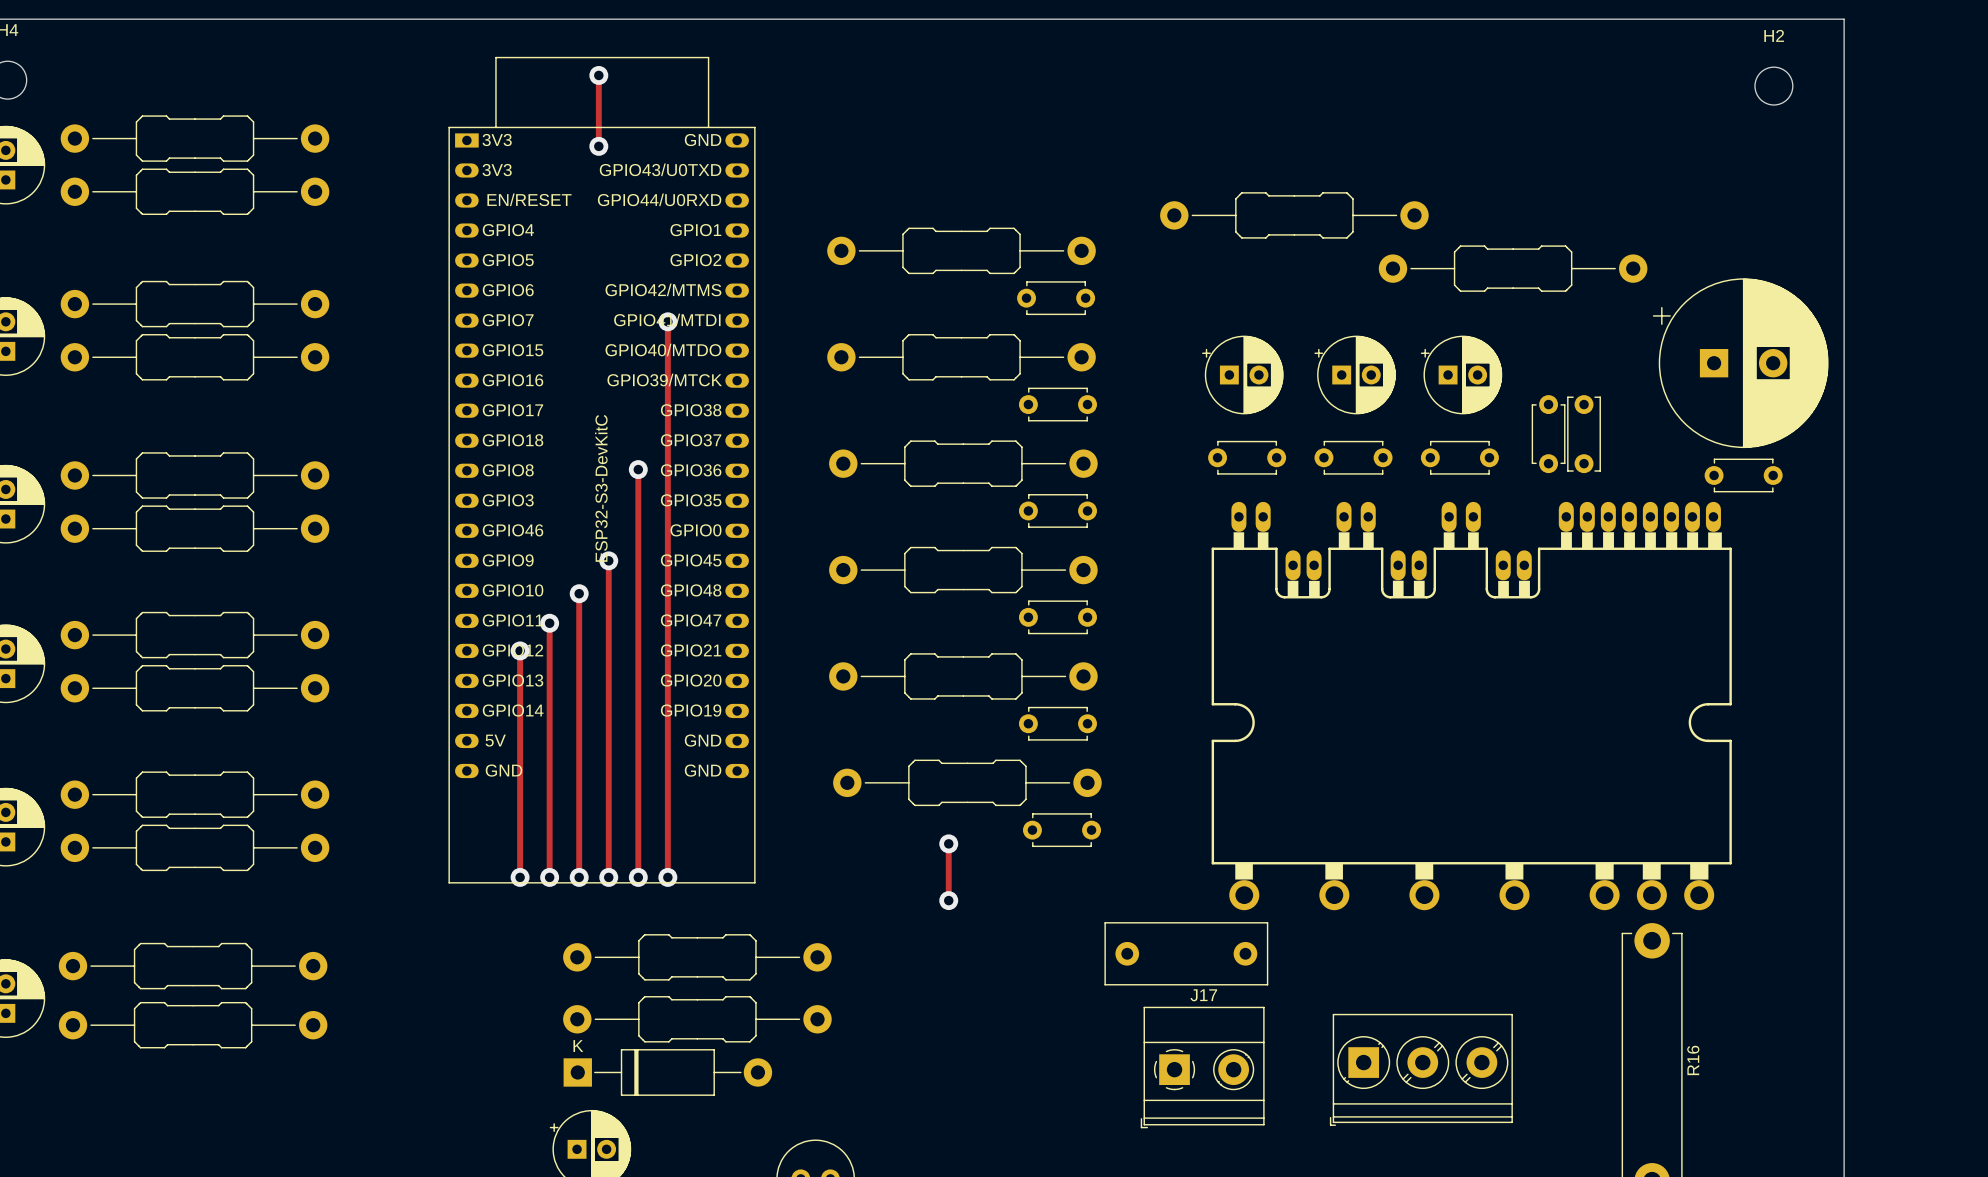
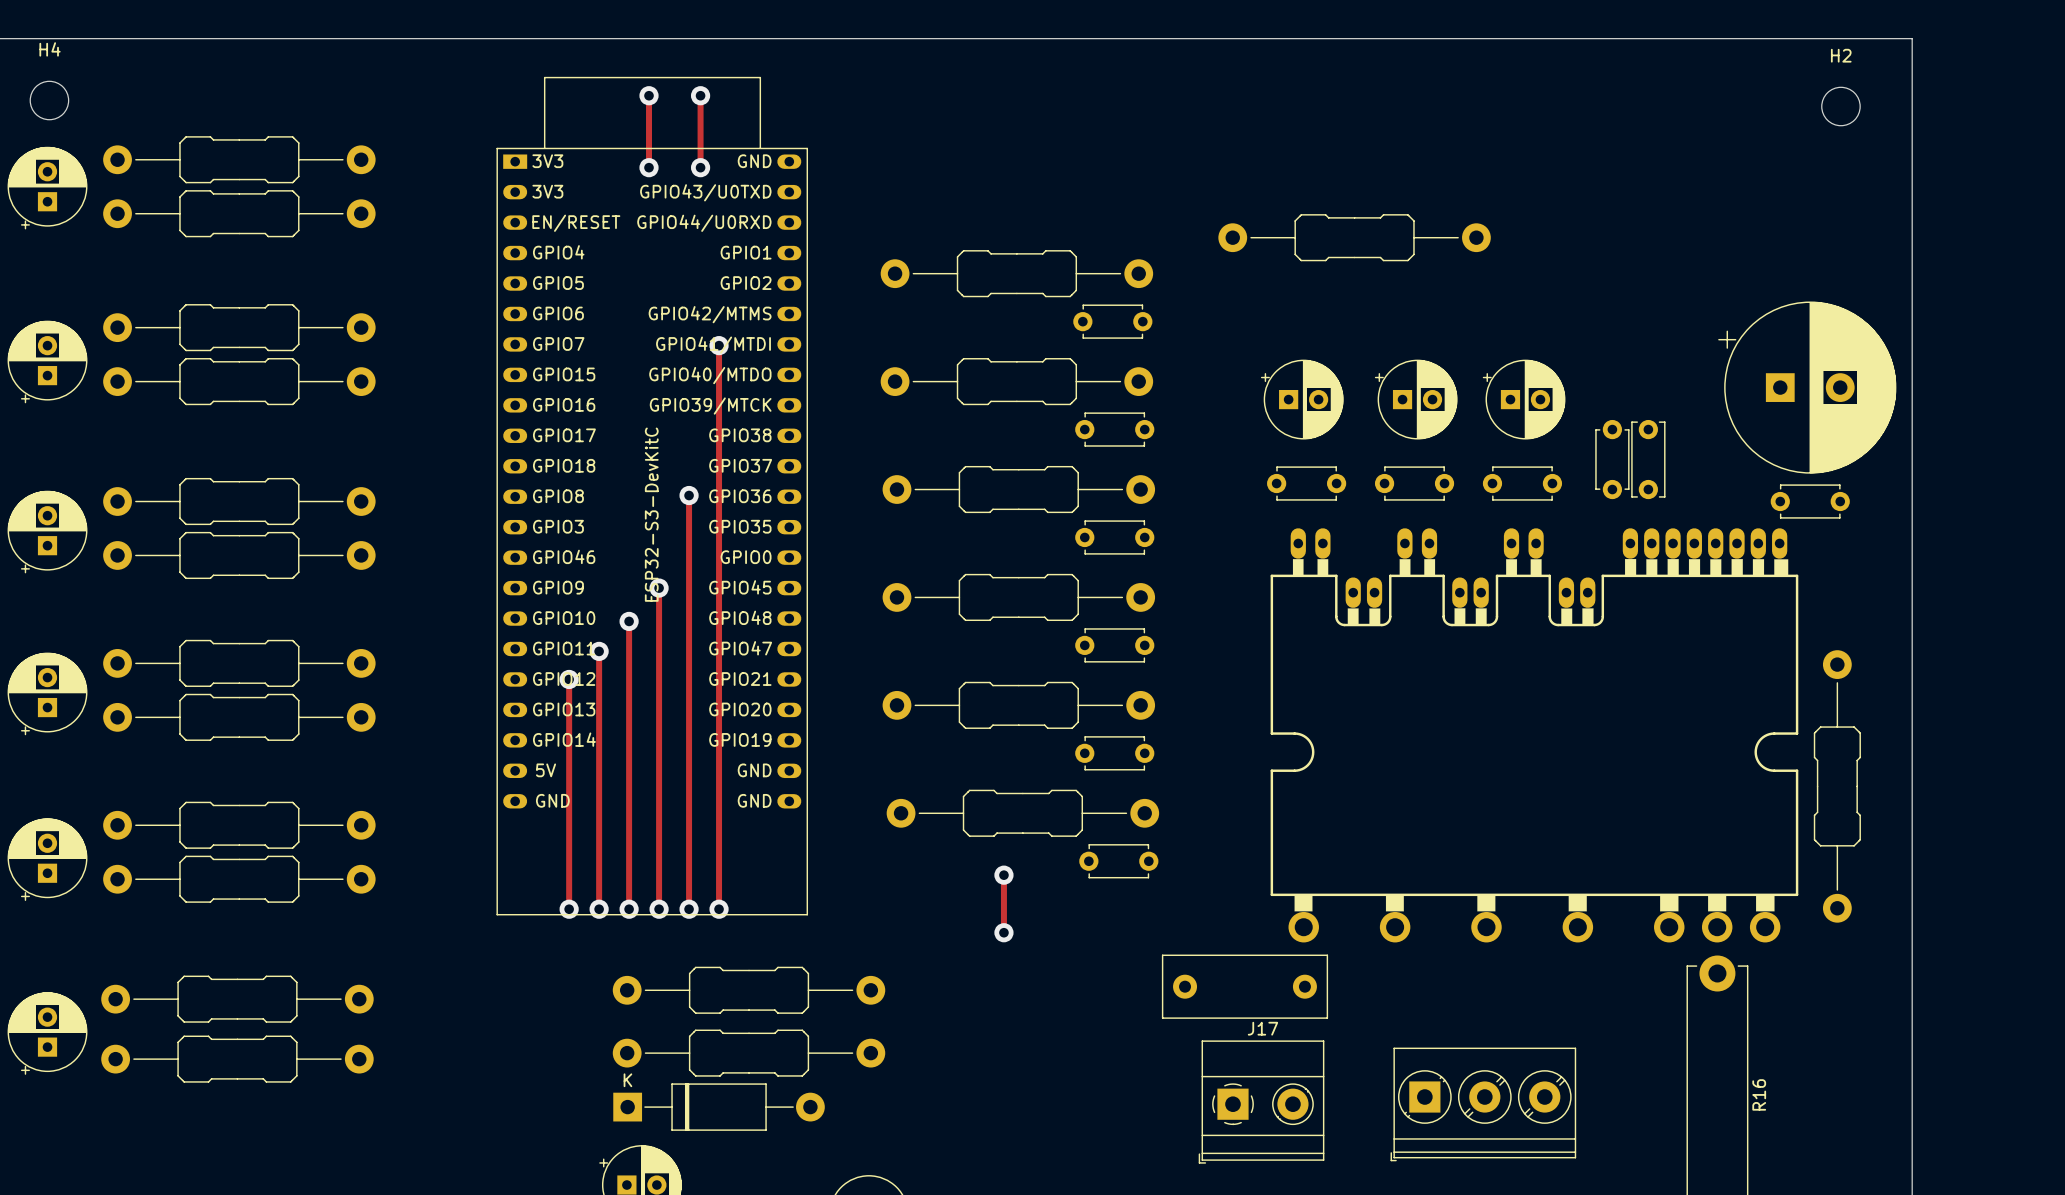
track: none -> (700, 95) (700, 167)
via: none -> (700, 95)
via: none -> (700, 167)
part: (1513, 268) -> none
part: none -> (1837, 786)

